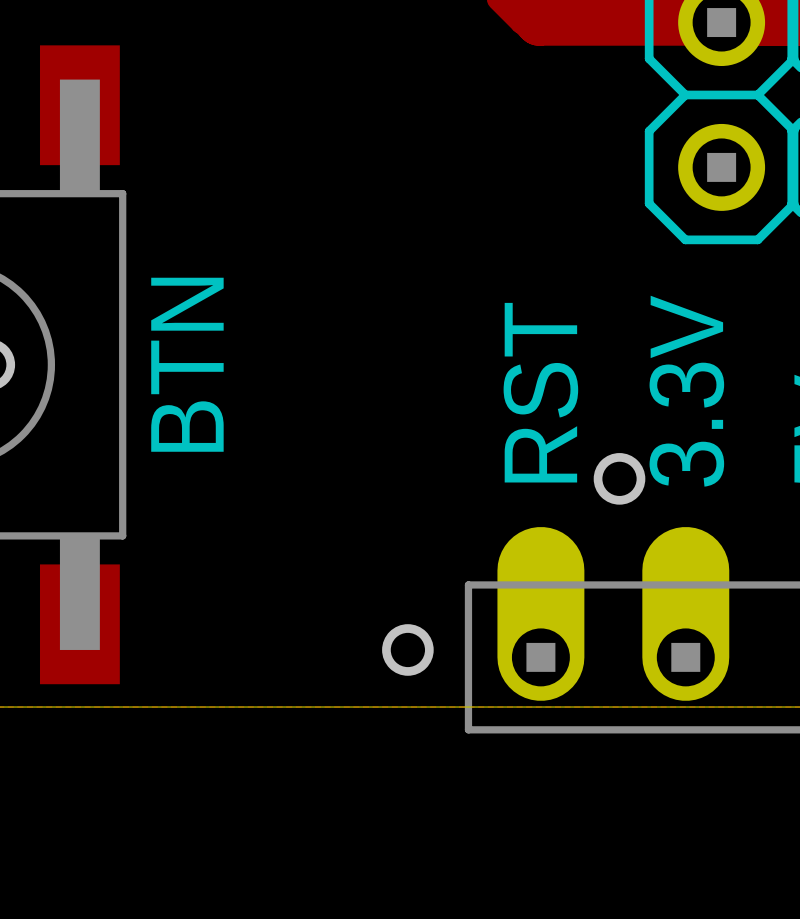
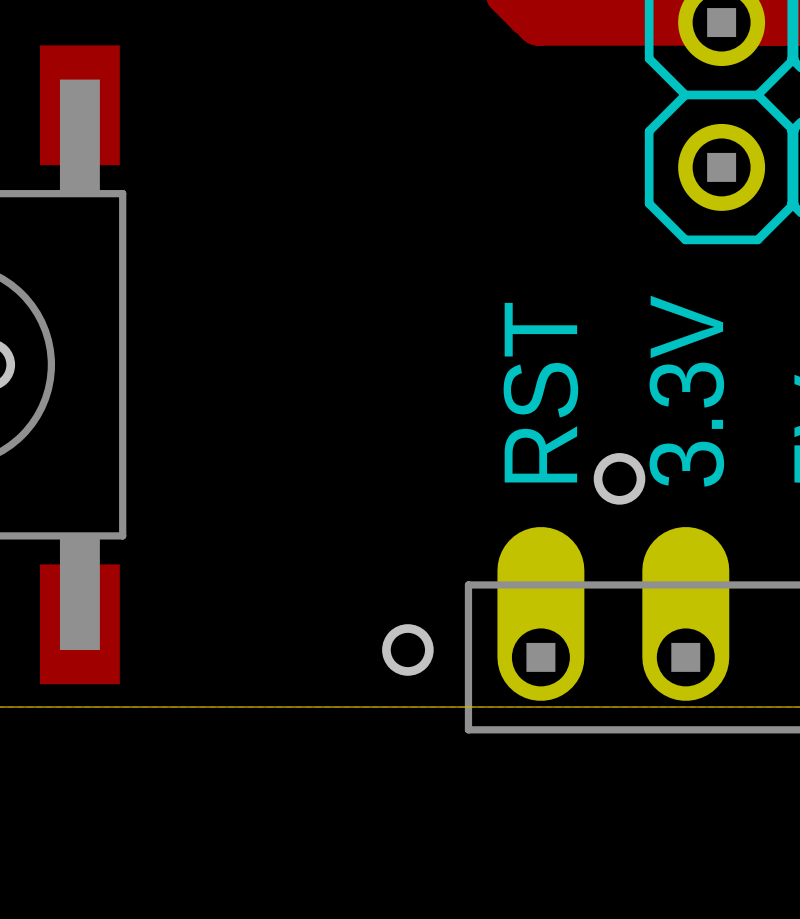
text: BTN (187, 364) -> none

